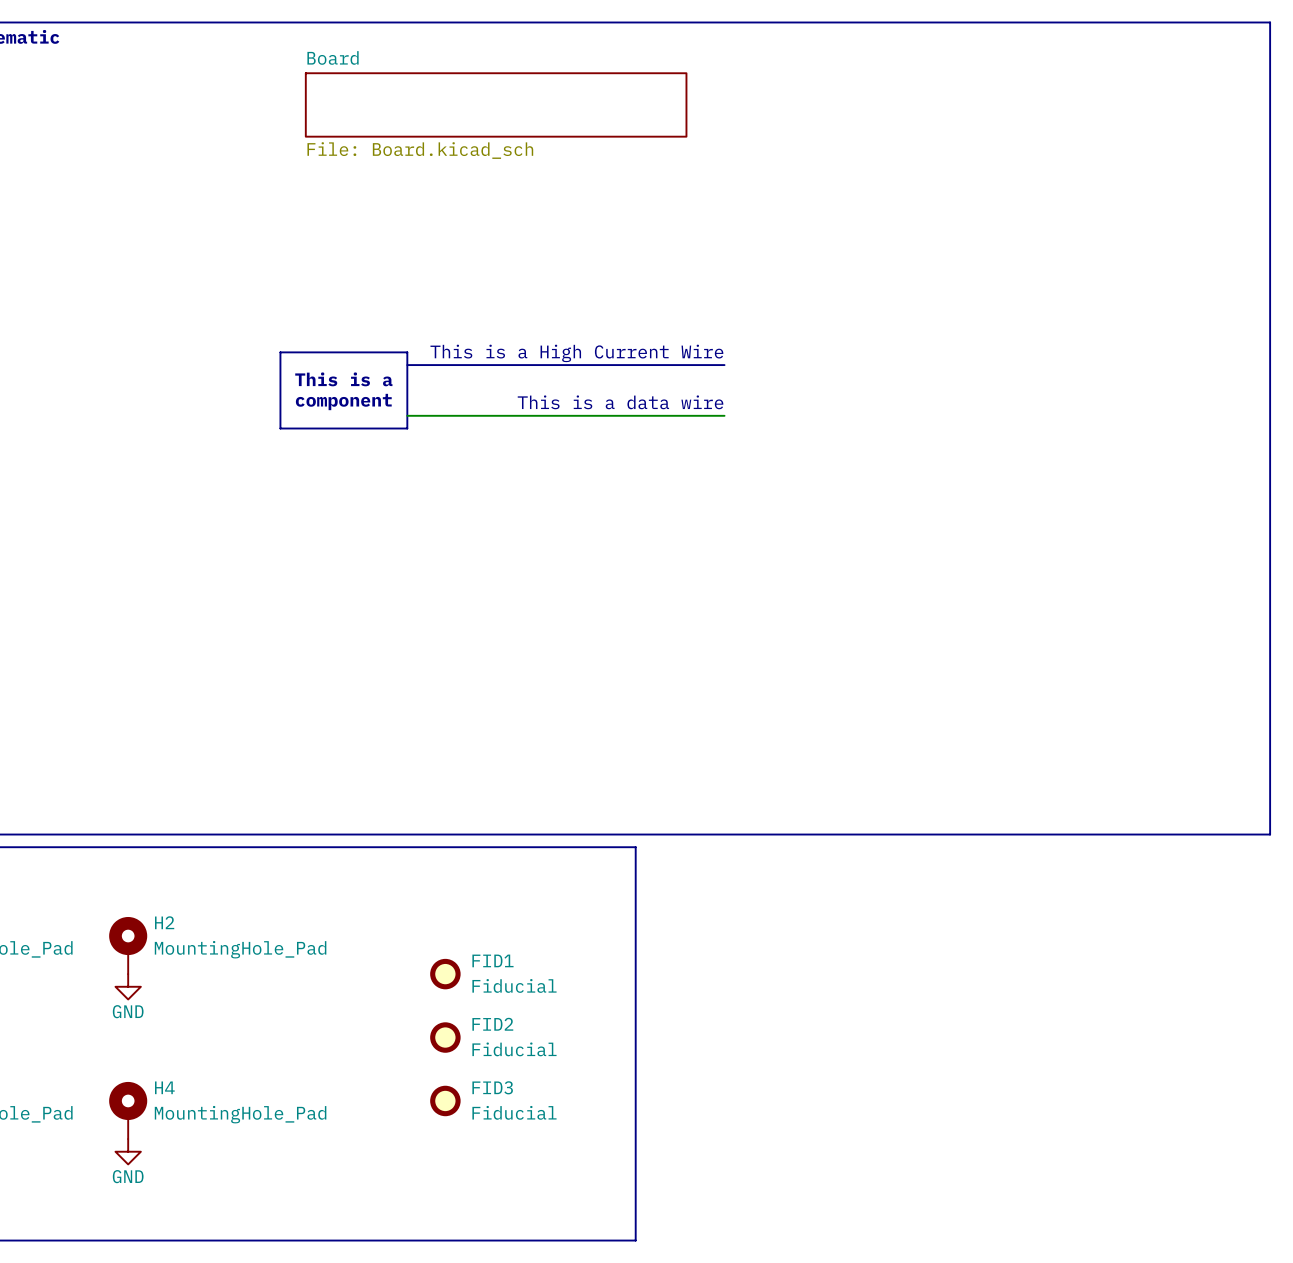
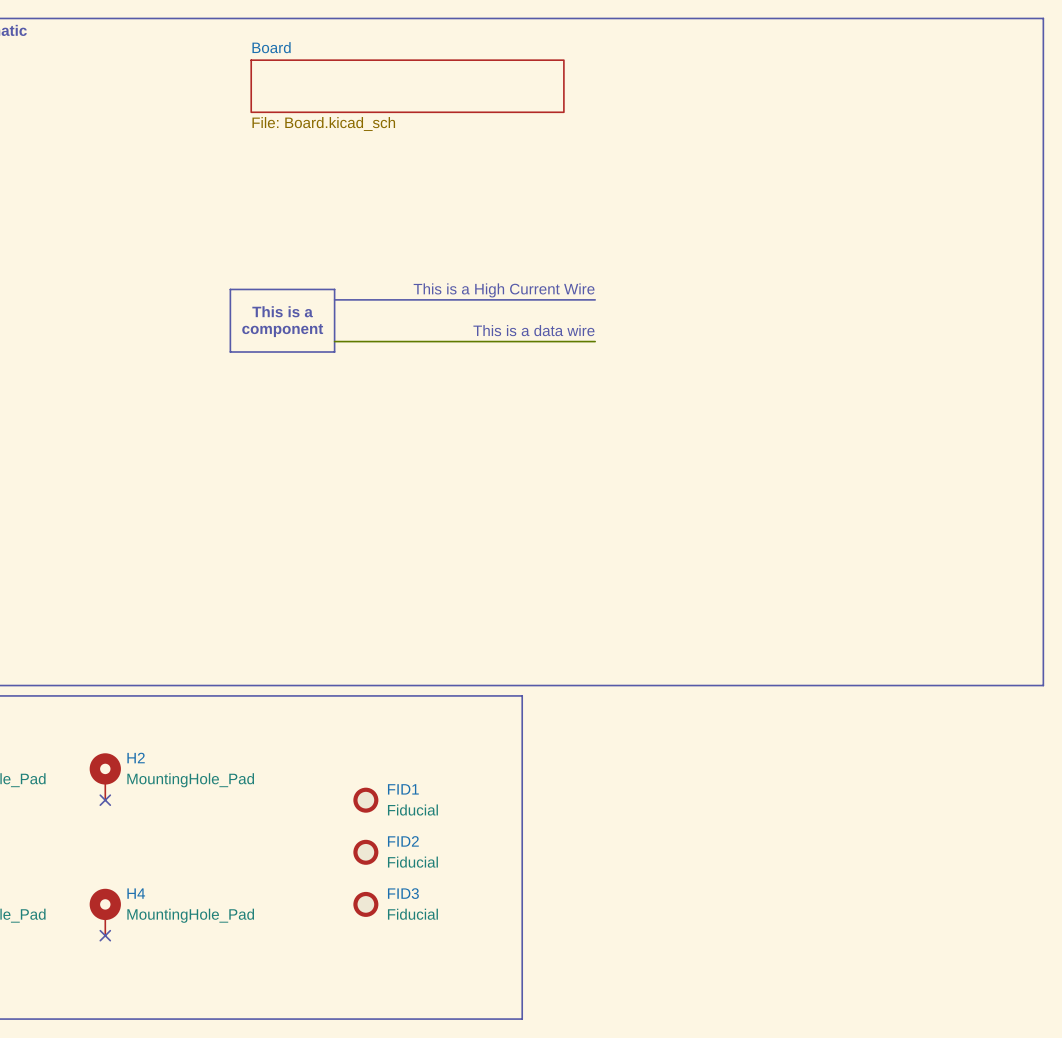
no-connect mark: none -> (105, 800)
power symbol: GND (128, 986) -> none
no-connect mark: none -> (105, 935)
power symbol: GND (128, 1151) -> none

